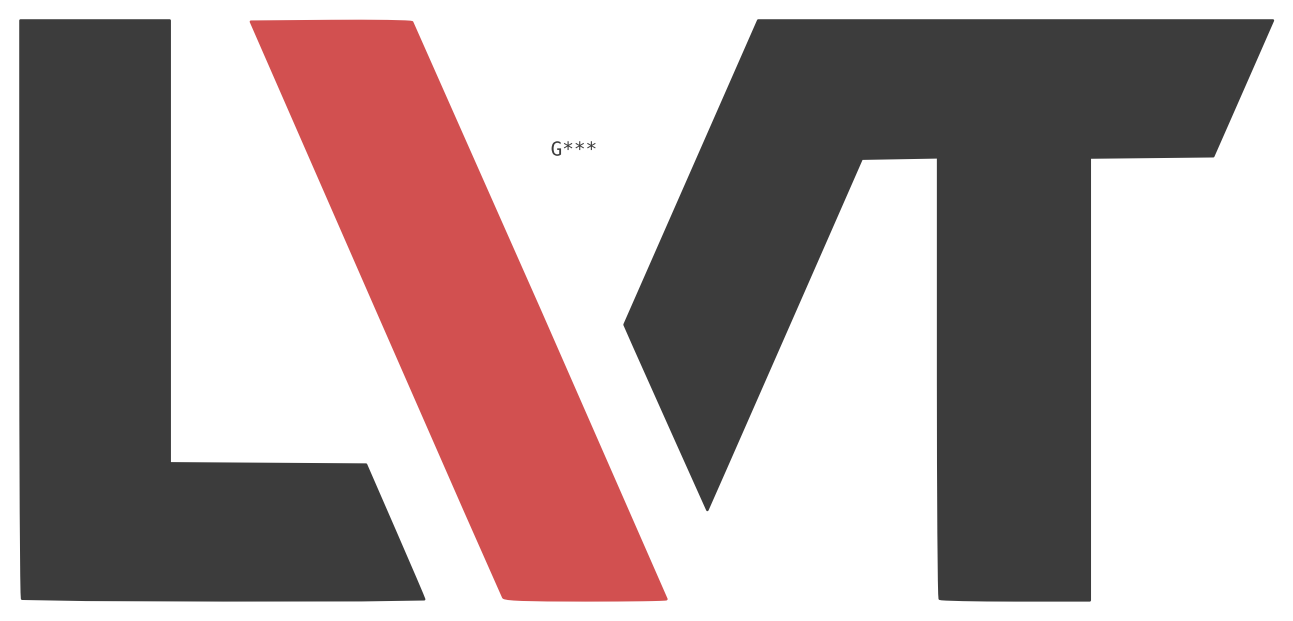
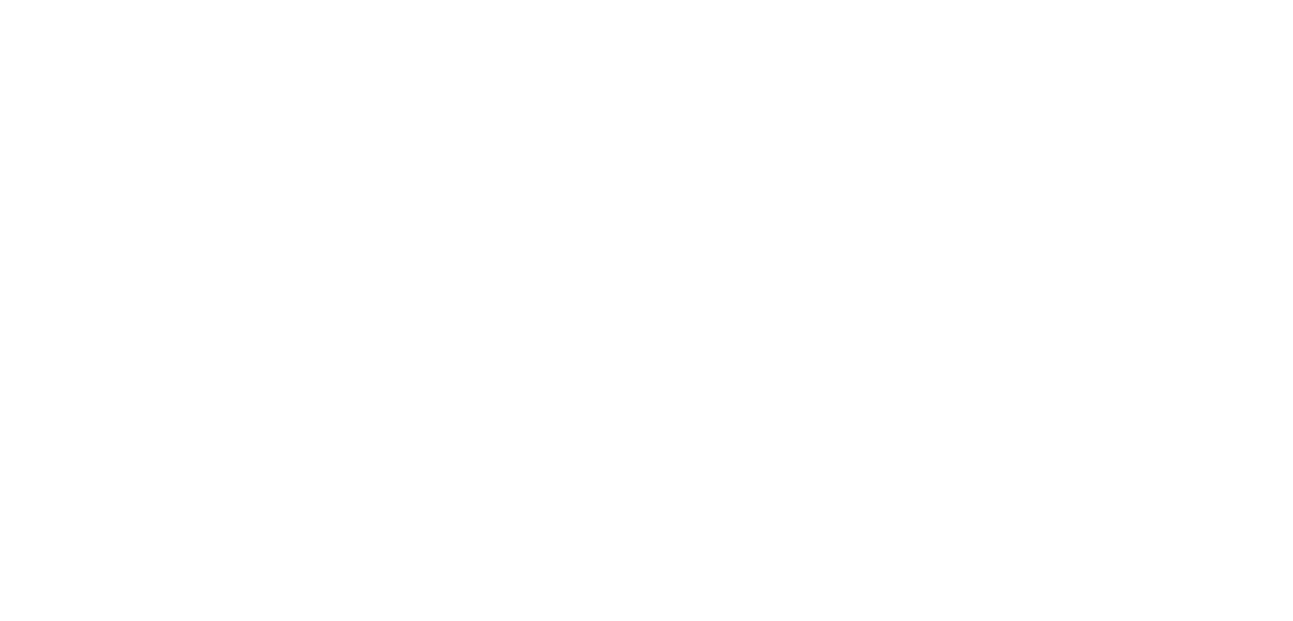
G***: (646, 310) -> none

